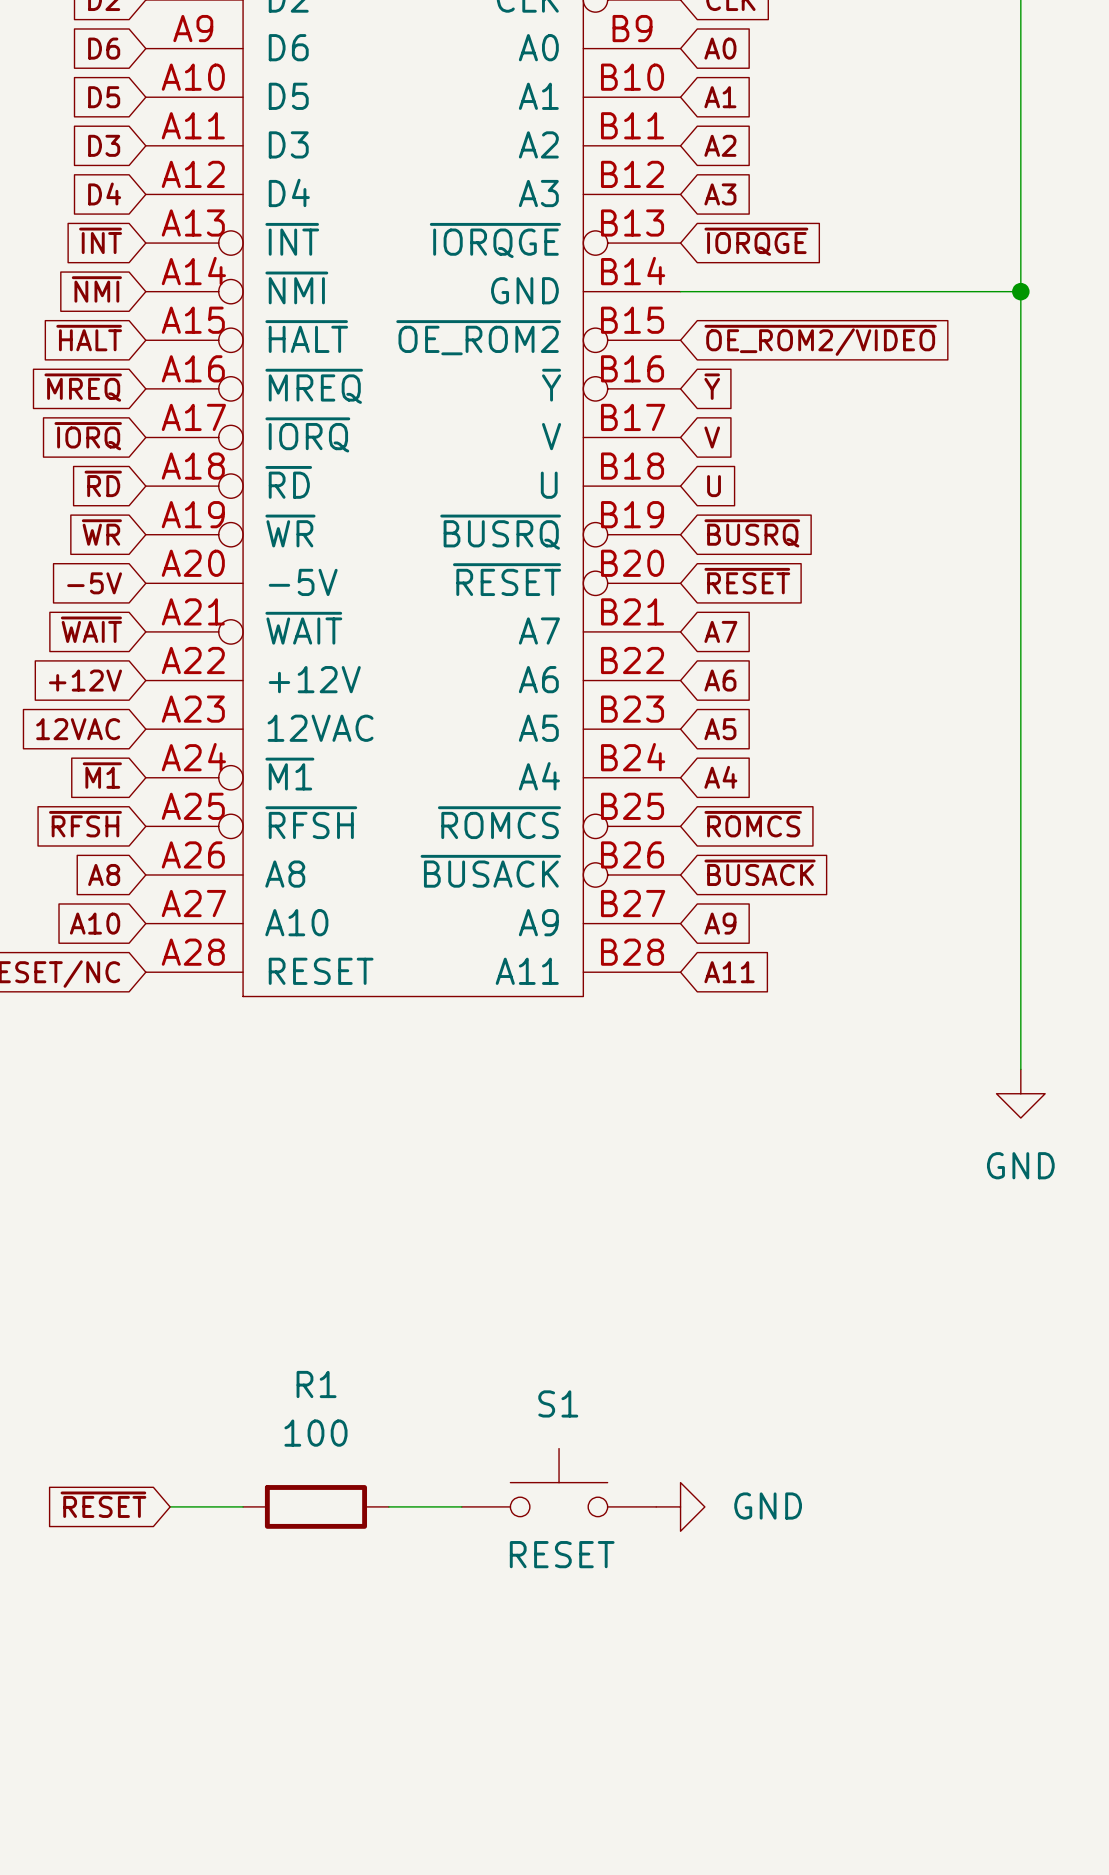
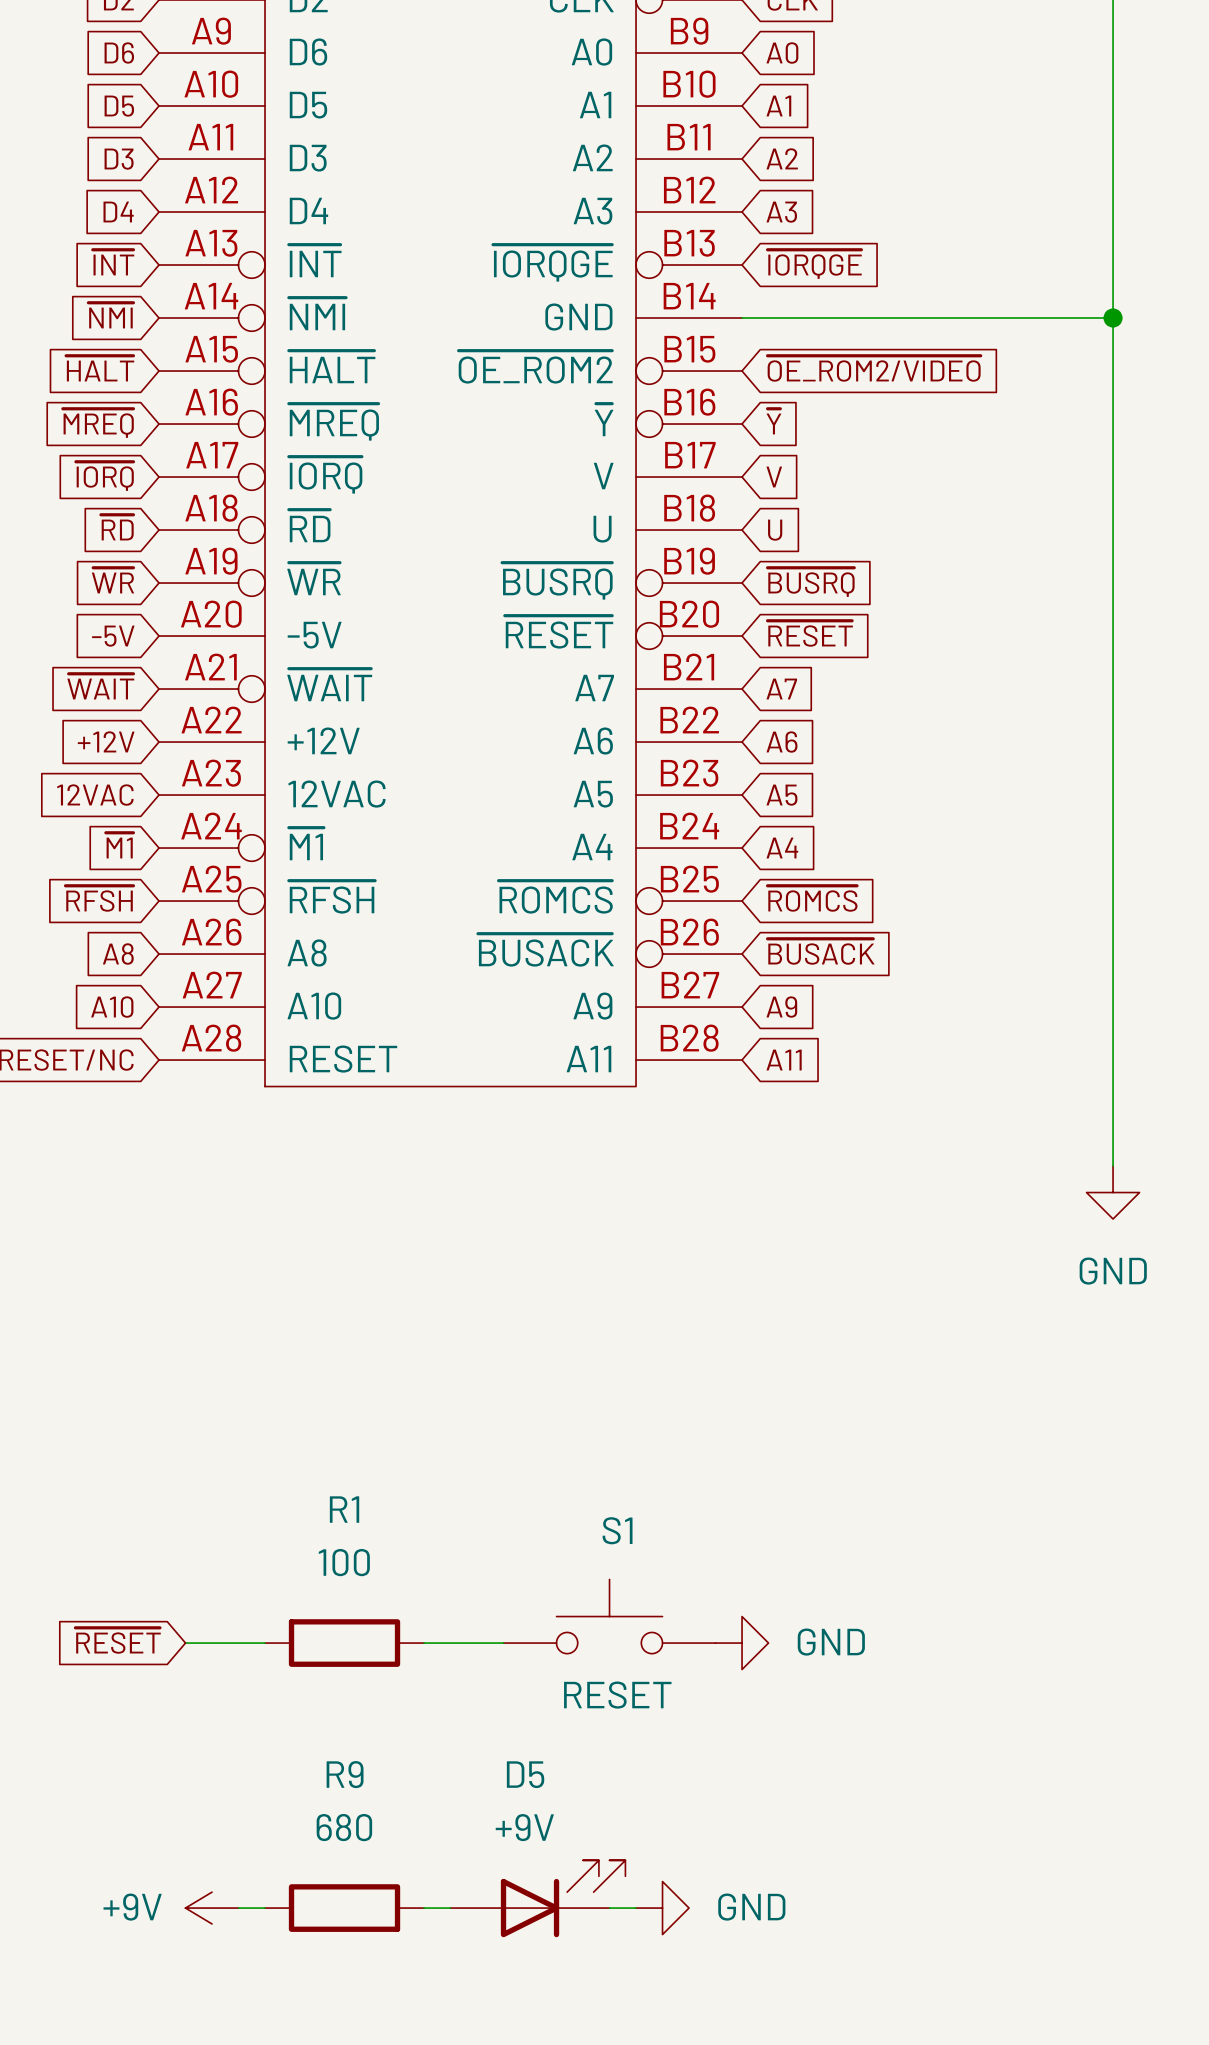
D5: none -> +9V (537, 1898)
power symbol: none -> +9V (212, 1908)
wire: none -> (238, 1908) (265, 1908)
R9: none -> 680 (344, 1908)
wire: none -> (424, 1908) (450, 1908)
wire: none -> (609, 1908) (636, 1908)
power symbol: none -> GND (662, 1908)

